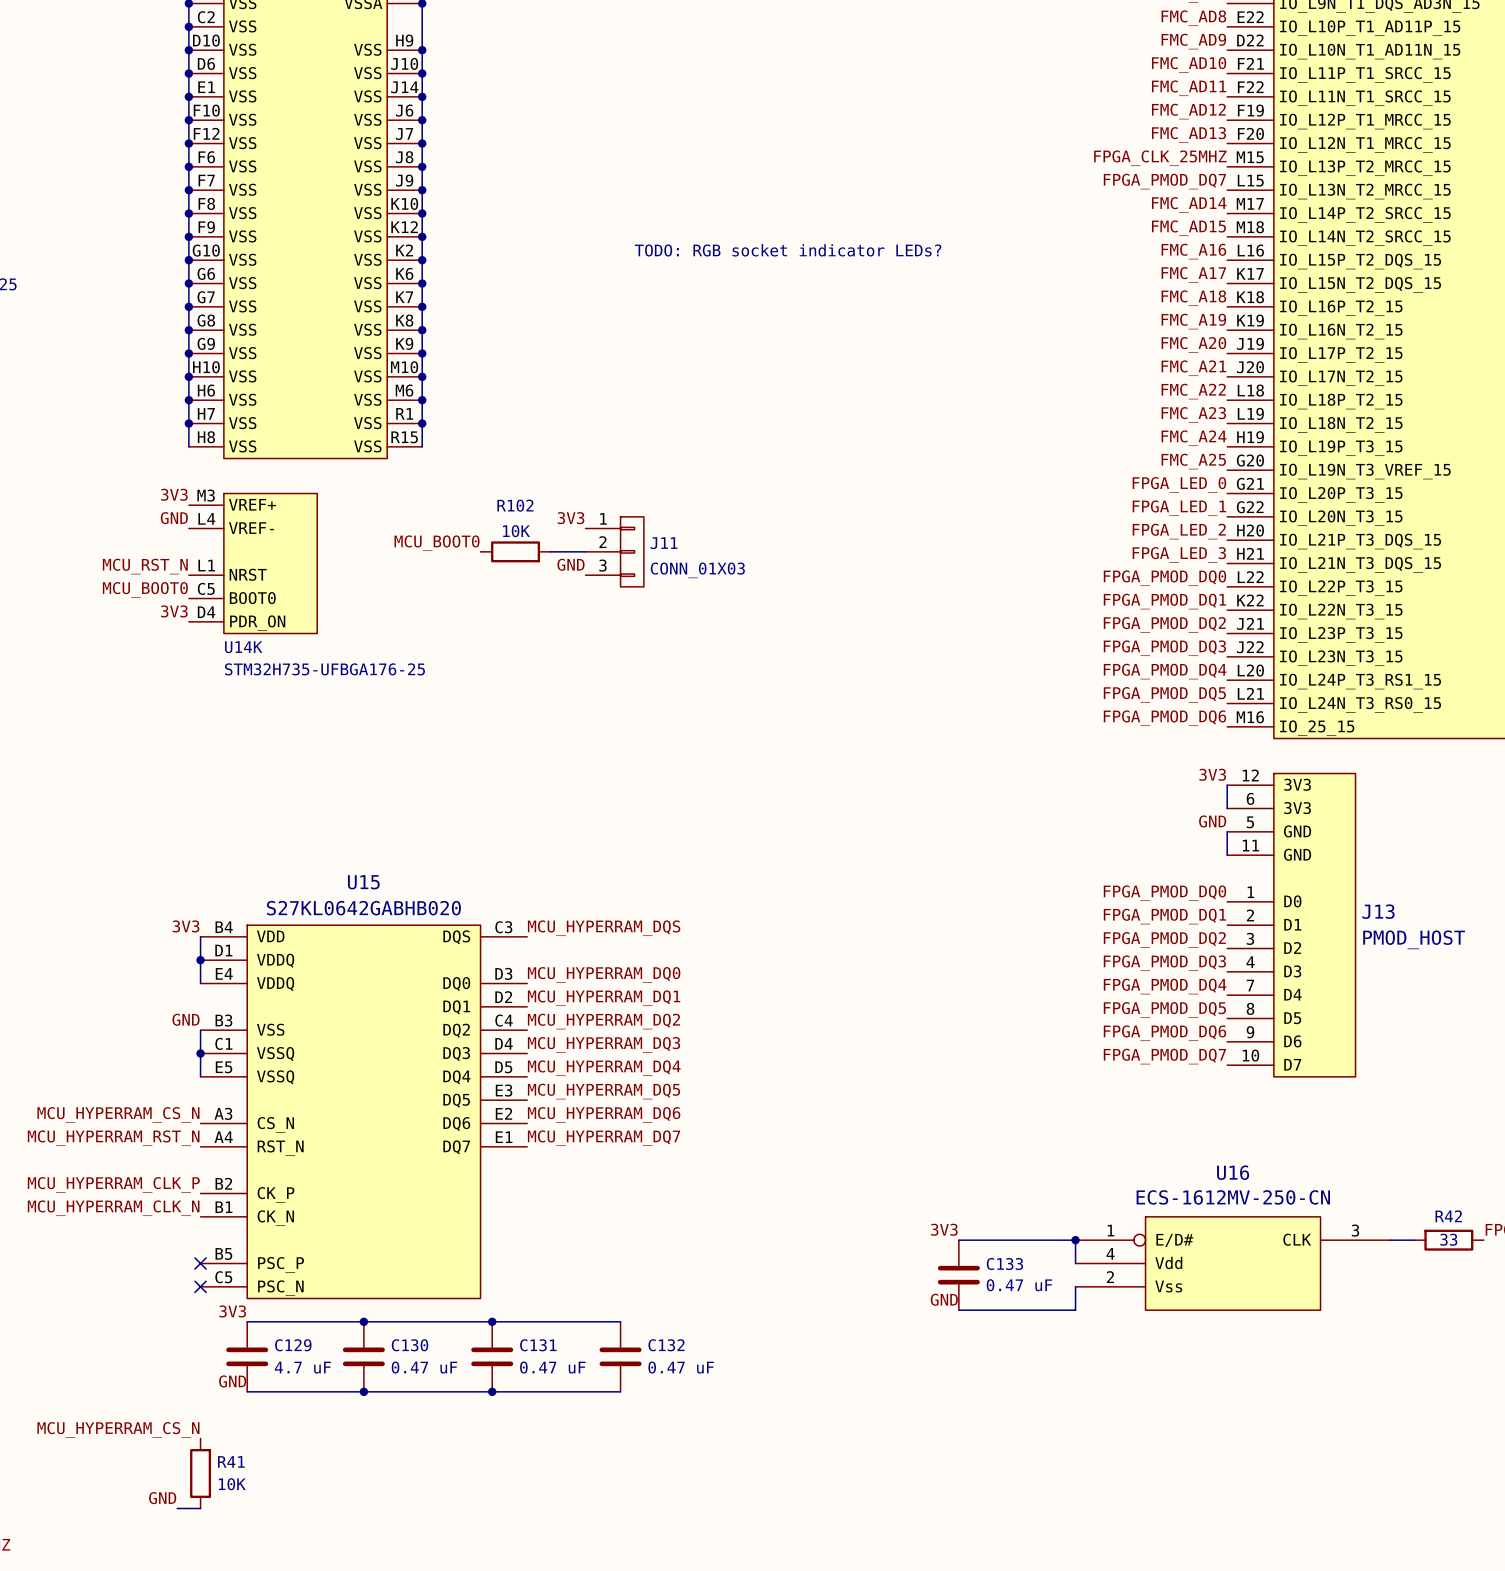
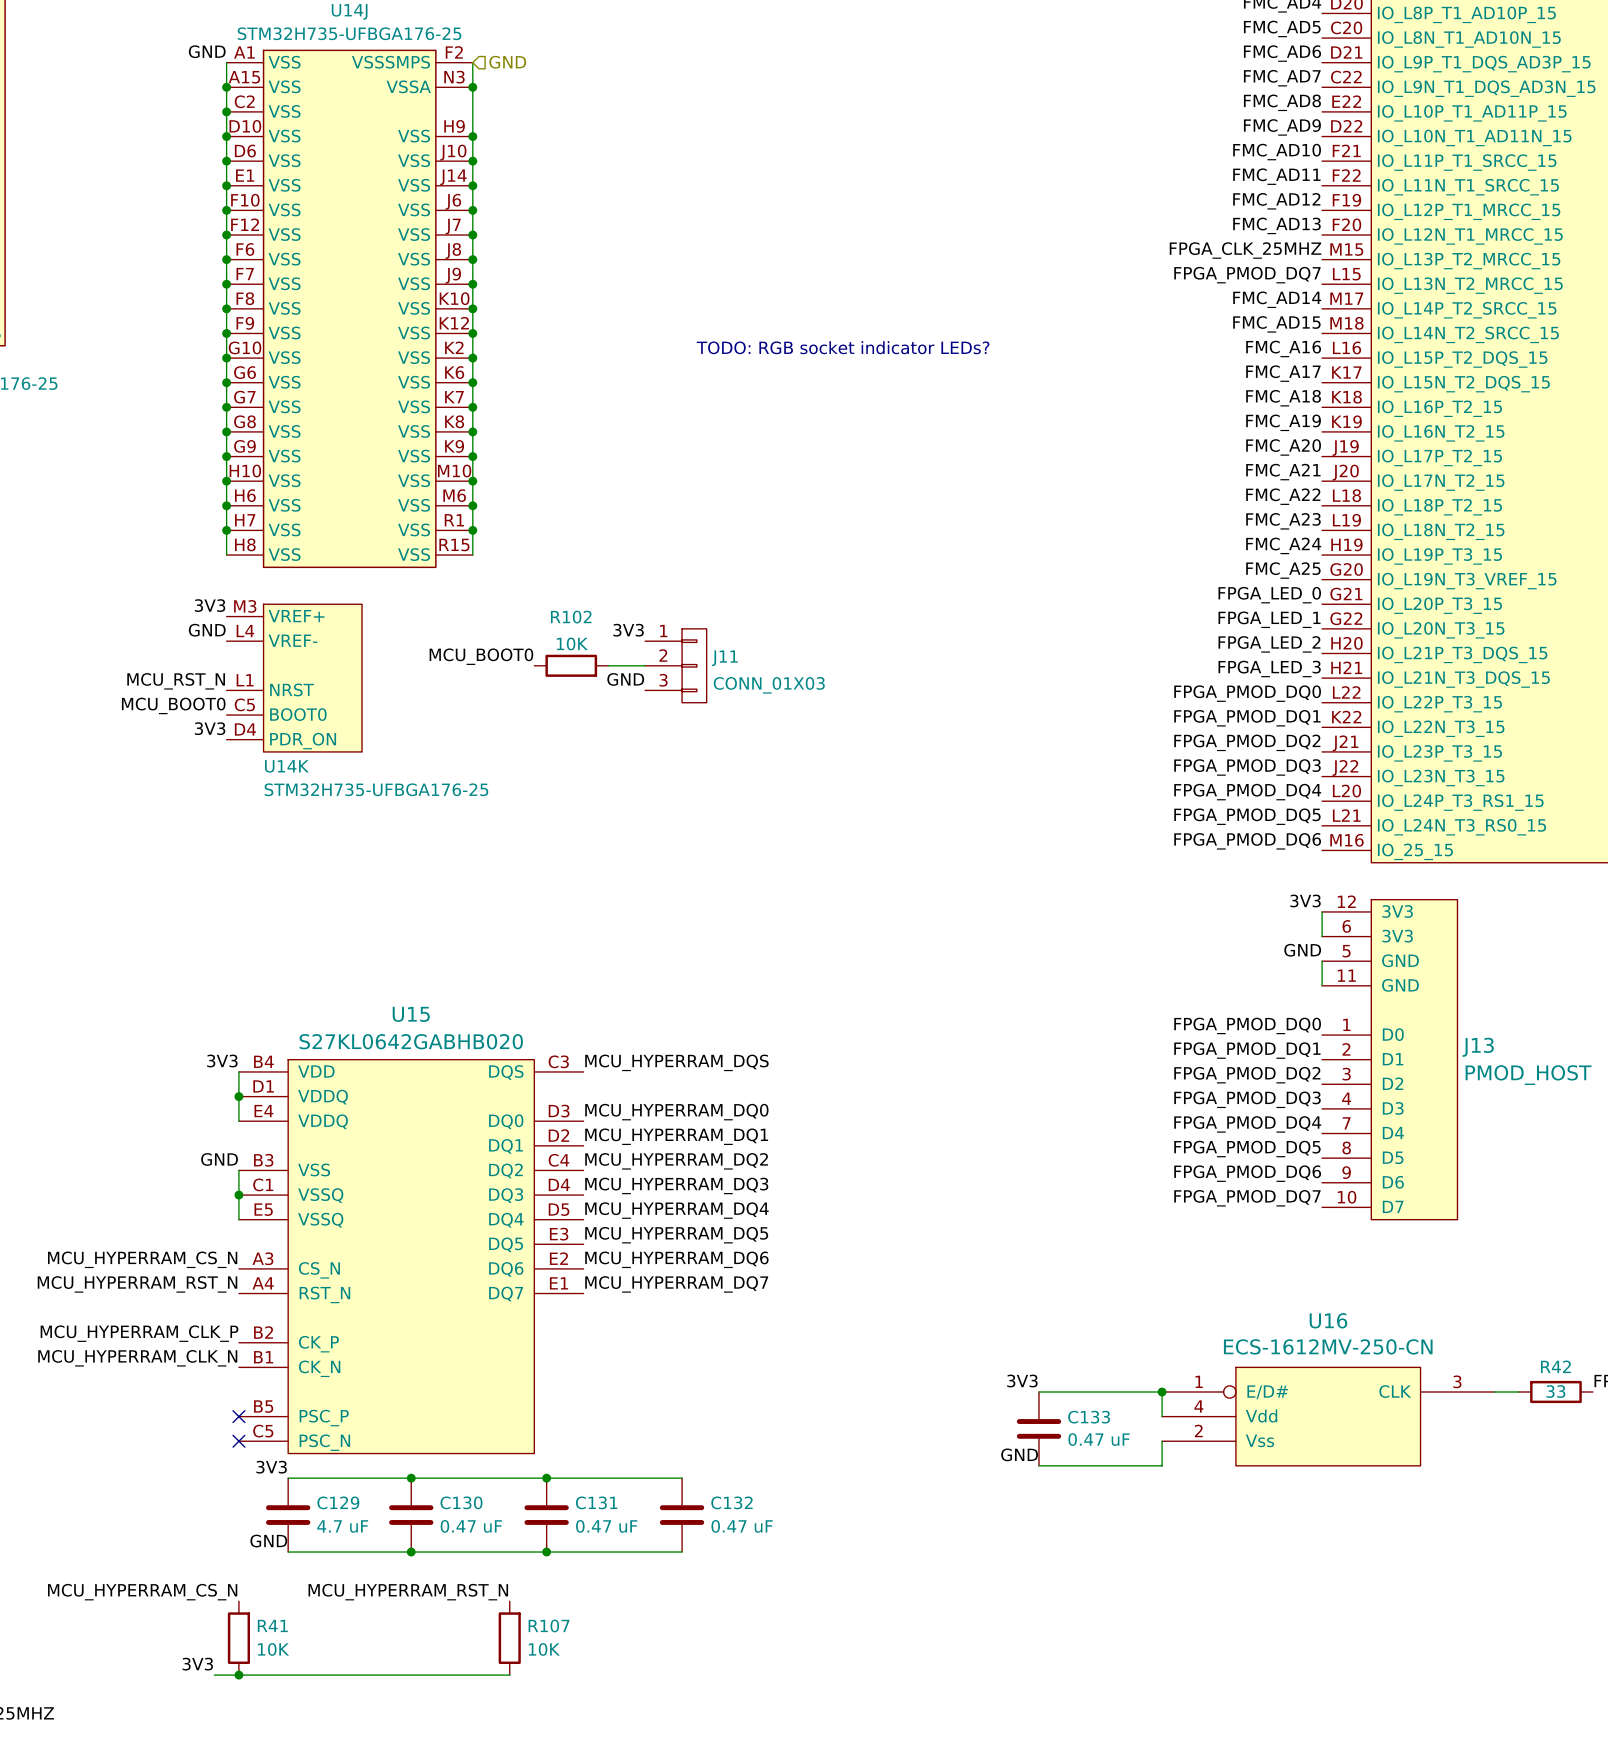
label: none -> MCU_HYPERRAM_RST_N (408, 1592)
R107: none -> 10K (509, 1638)
label: GND (162, 1498) -> 3V3 (197, 1664)
wire: none -> (238, 1675) (509, 1675)
junction: none -> (238, 1675)

